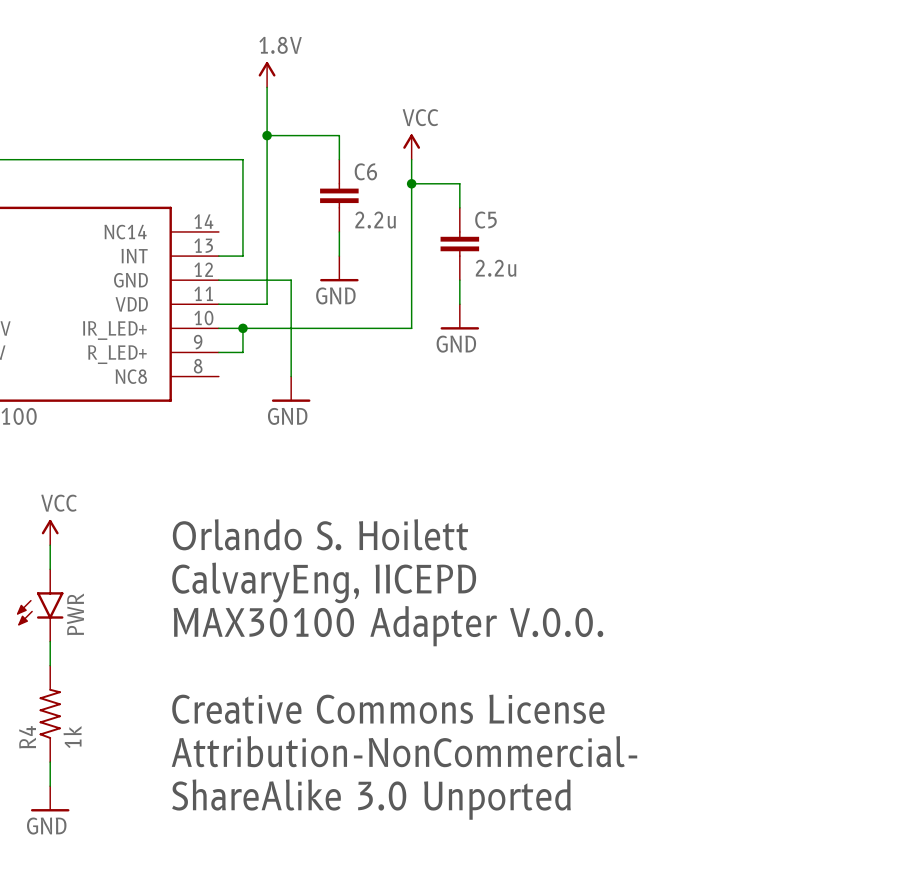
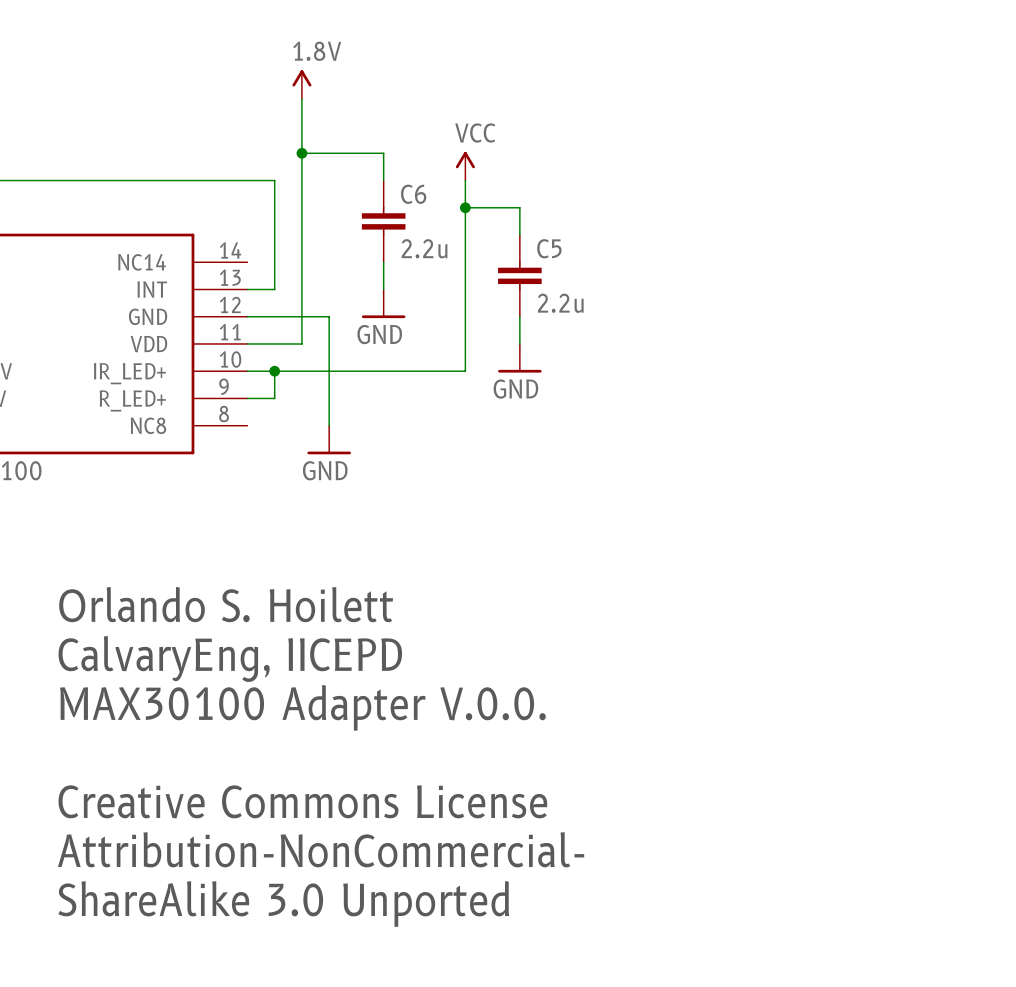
power symbol: VCC (50, 532) -> none
text position: Orlando S. Hoilett (320, 534) -> Orlando S. Hoilett (226, 604)
wire: (50, 545) (50, 569) -> none
text position: CalvaryEng, IICEPD (324, 582) -> CalvaryEng, IICEPD (230, 659)
PWR: (40, 605) -> none
text position: MAX30100 Adapter V.0.0. (388, 626) -> MAX30100 Adapter V.0.0. (302, 707)
wire: (50, 641) (50, 665) -> none
text position: Creative Commons License (388, 709) -> Creative Commons License (302, 801)
R4: 1k (50, 713) -> none
text position: Attribution-NonCommercial- (404, 751) -> Attribution-NonCommercial- (321, 849)
wire: (50, 762) (50, 786) -> none
power symbol: GND (50, 798) -> none
text position: ShareAlike 3.0 Unported (371, 799) -> ShareAlike 3.0 Unported (283, 903)

